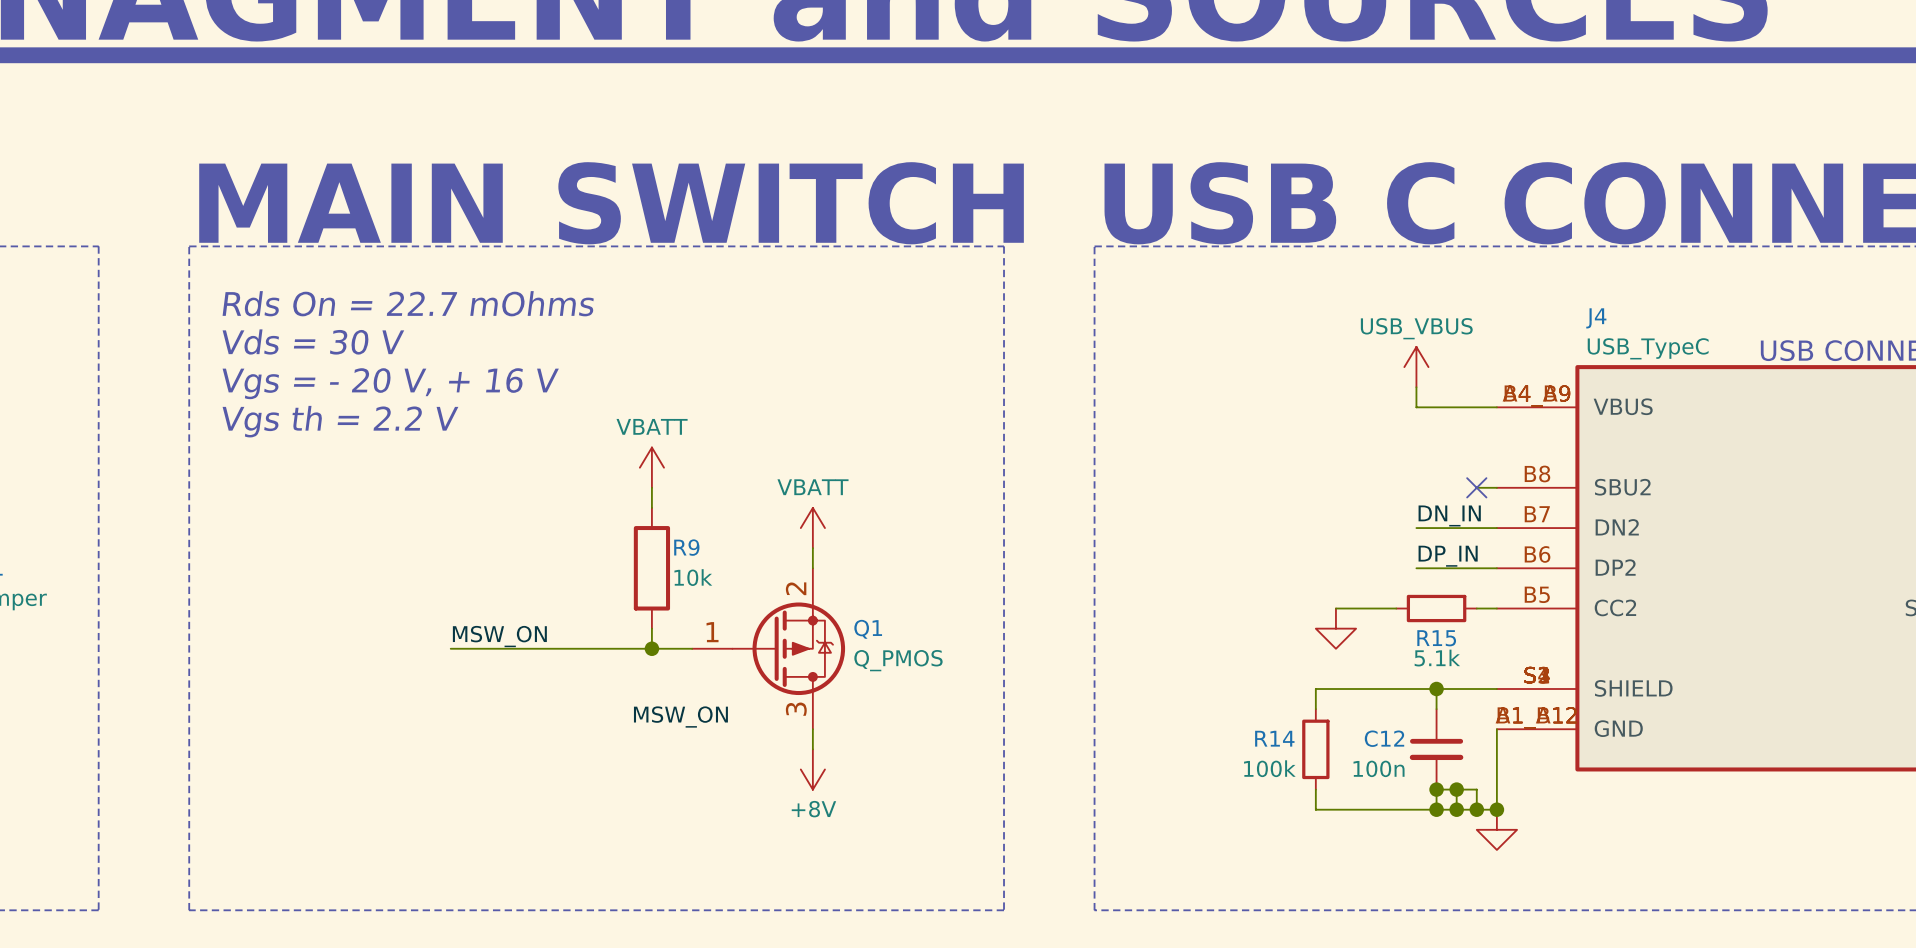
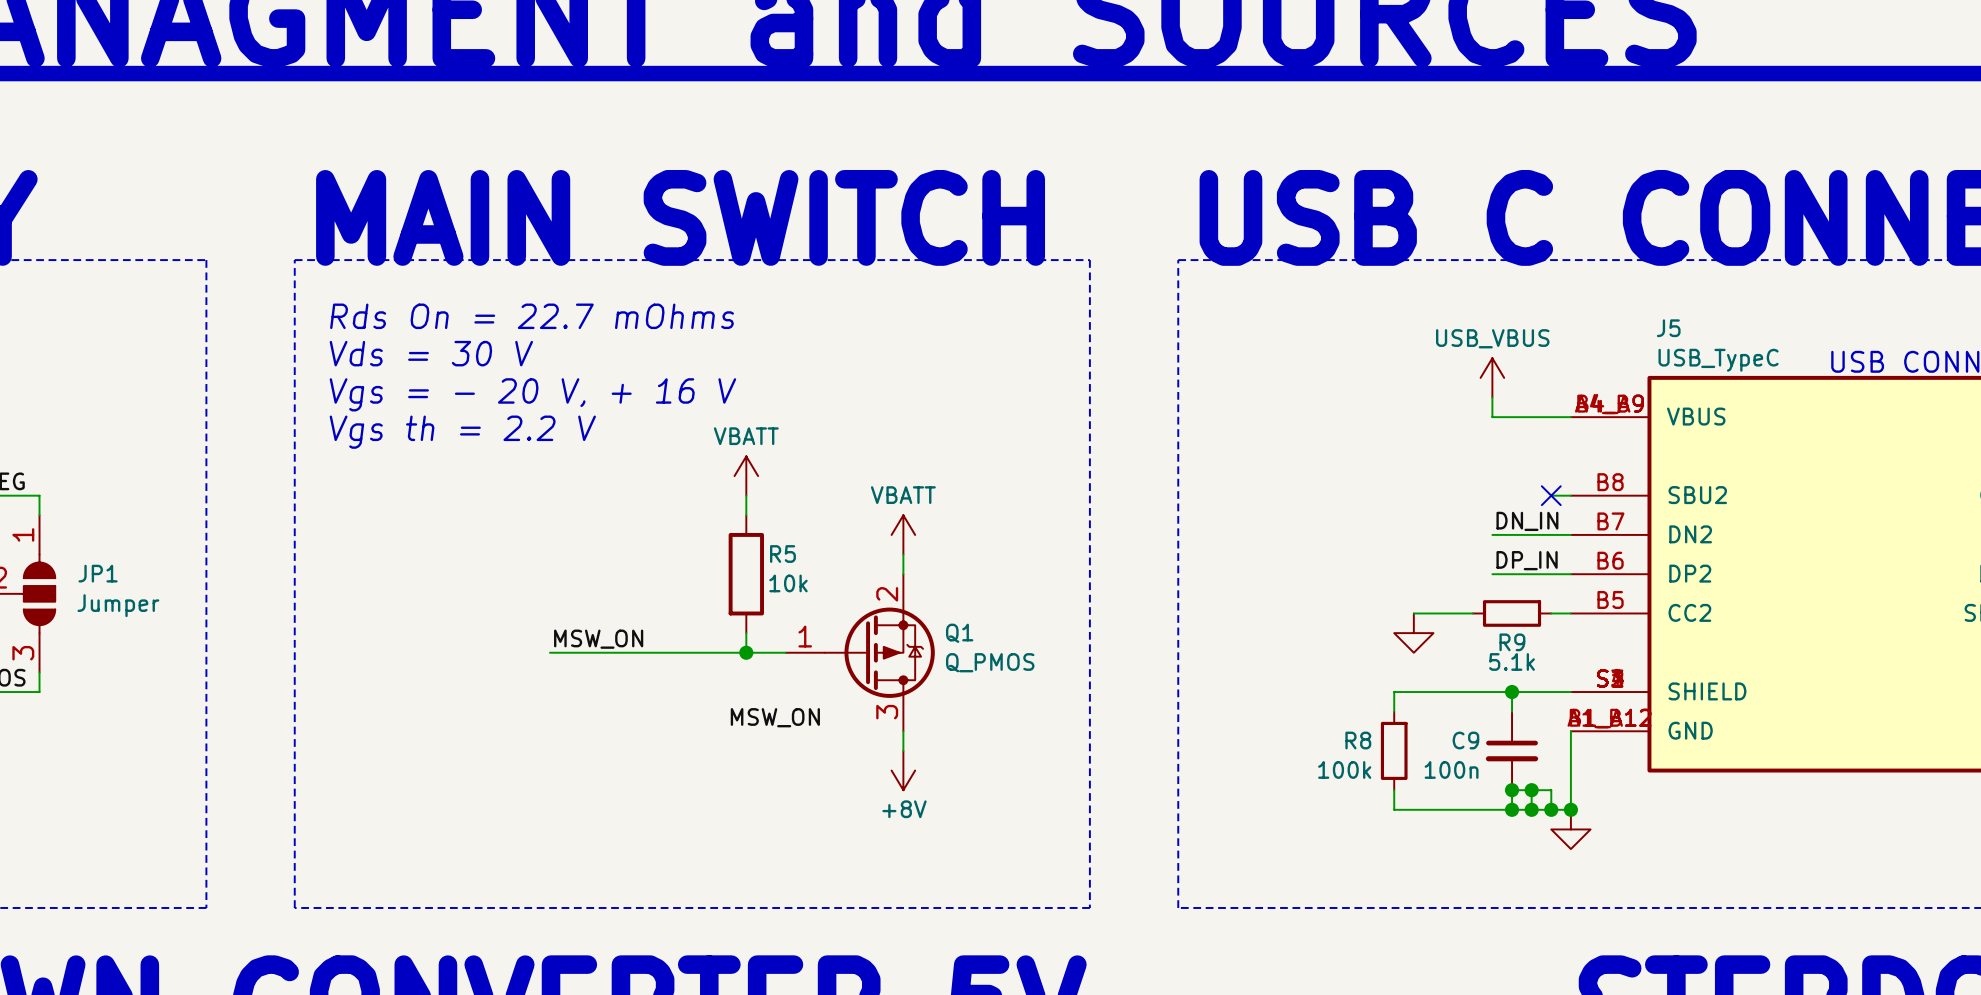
J4 name: J4 (1596, 318) -> J5 (1668, 328)
R9 name: R9 (686, 547) -> R5 (782, 554)
R15 name: R15 (1436, 638) -> R9 (1512, 642)
R14 name: R14 (1274, 738) -> R8 (1358, 740)
C12 name: C12 (1384, 738) -> C9 (1465, 740)

